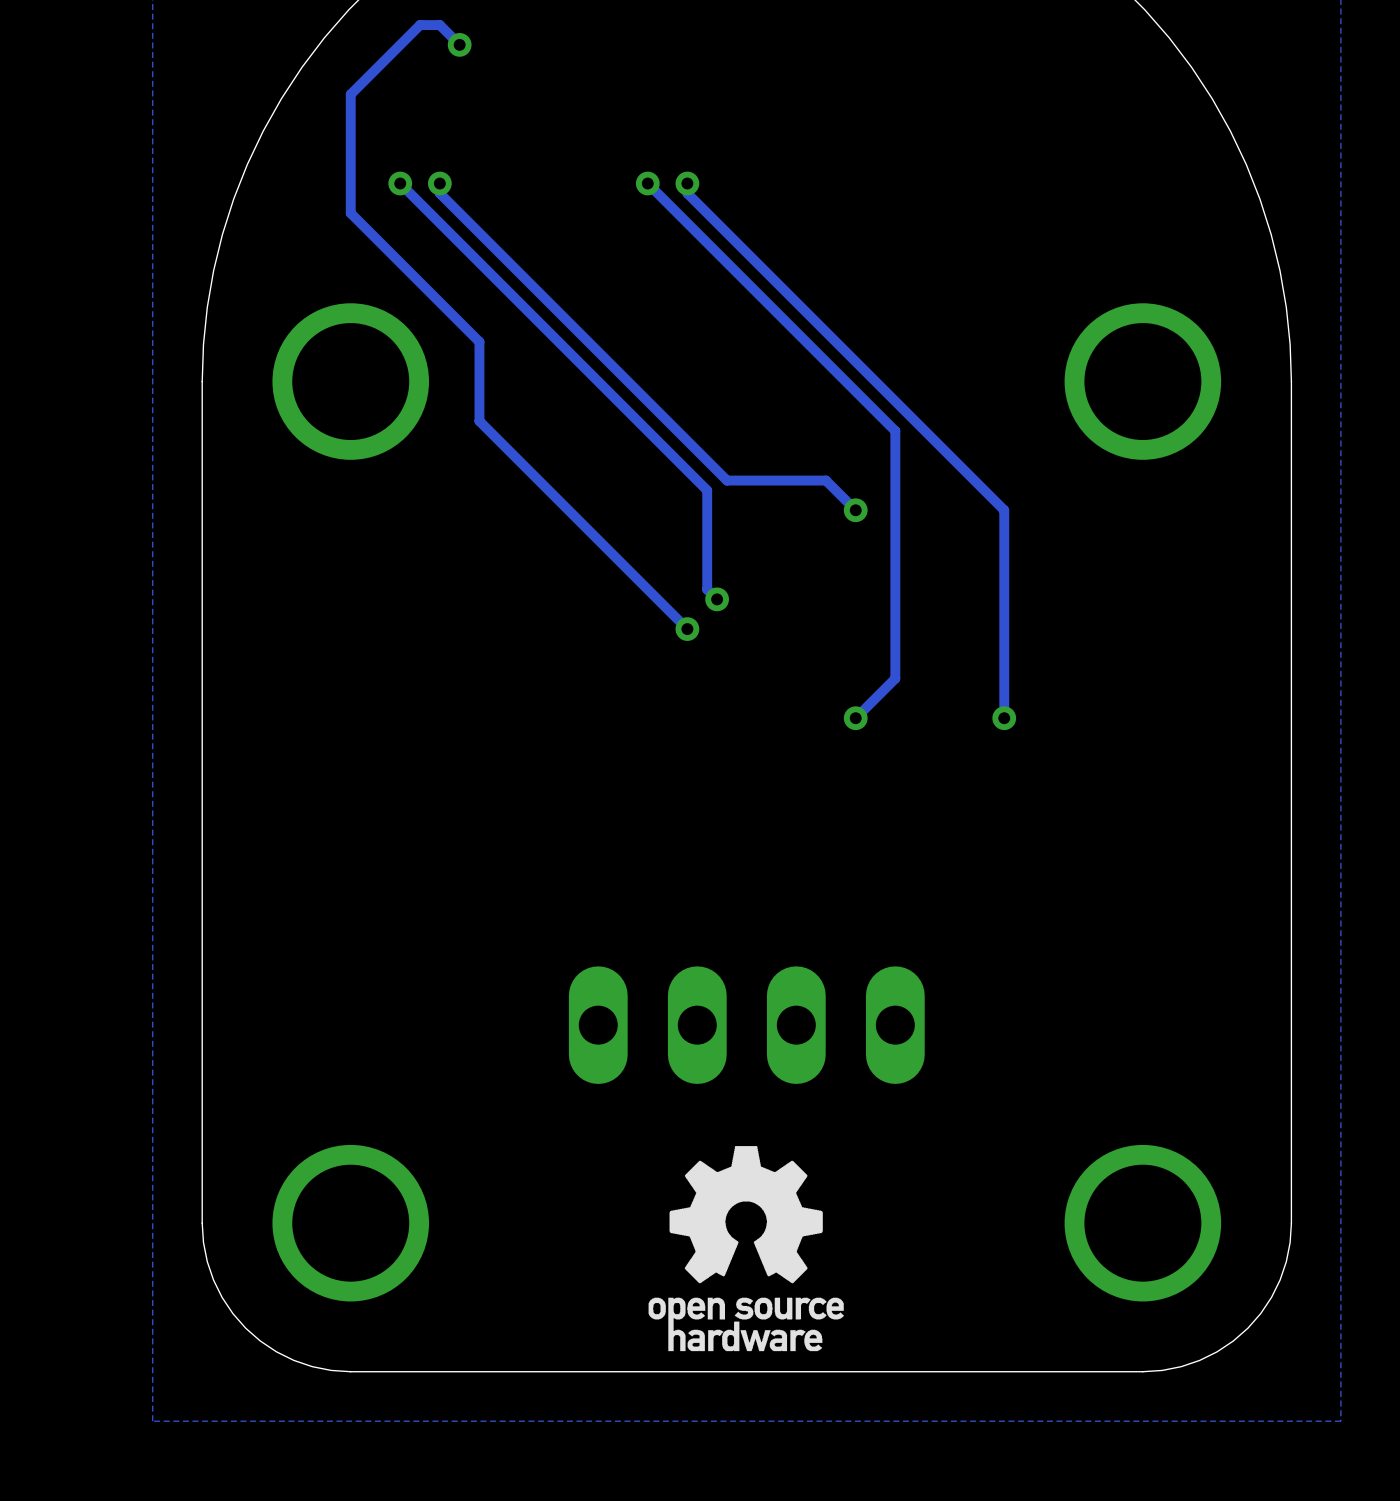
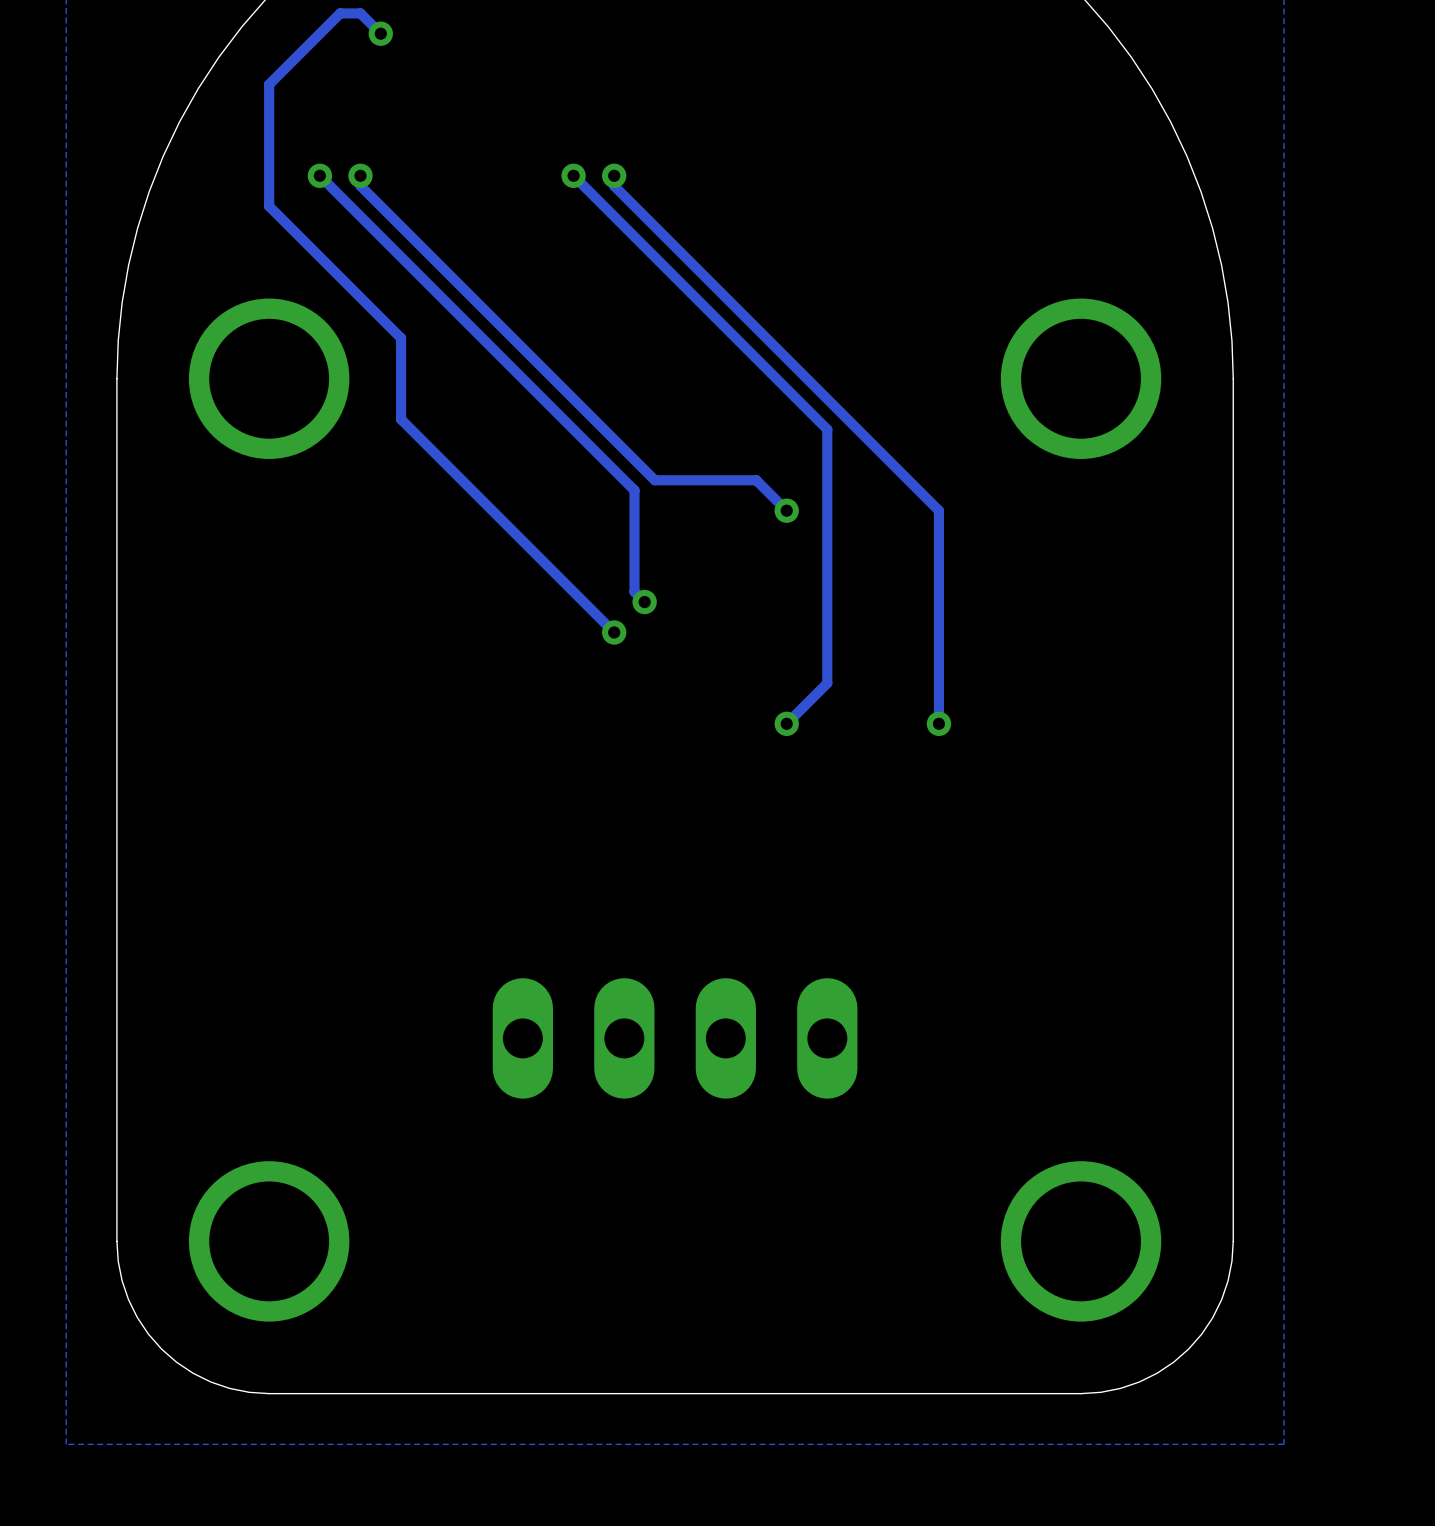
drawing: [648, 1146, 844, 1352] -> none

